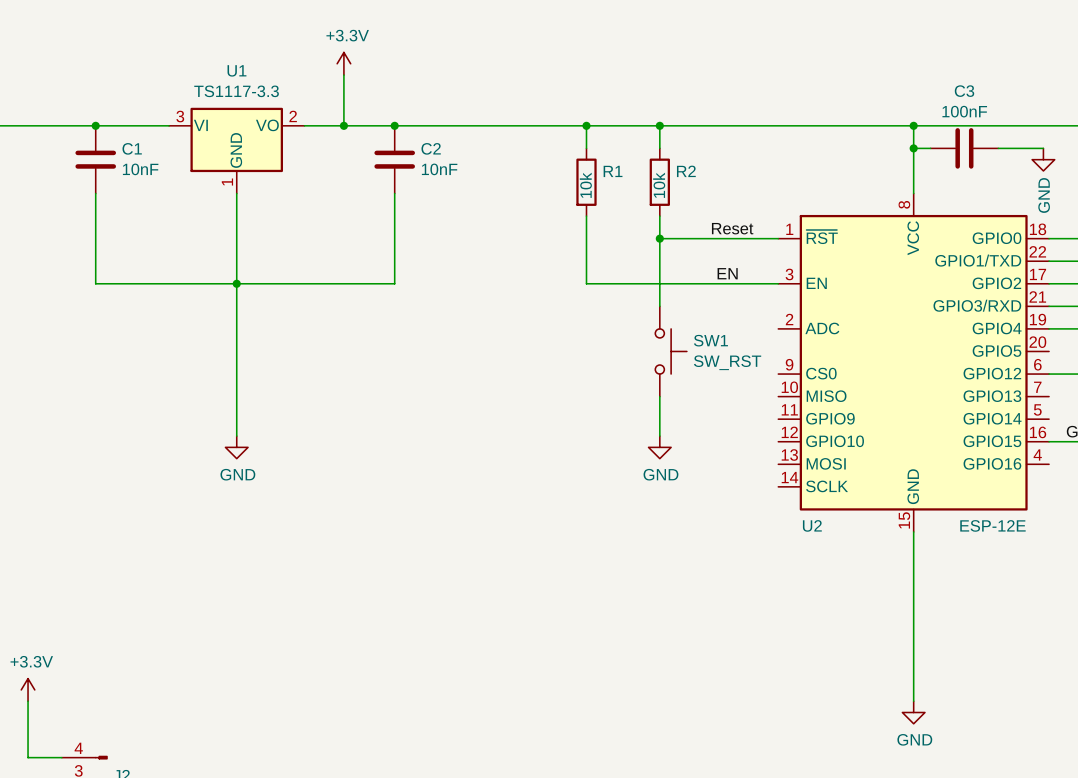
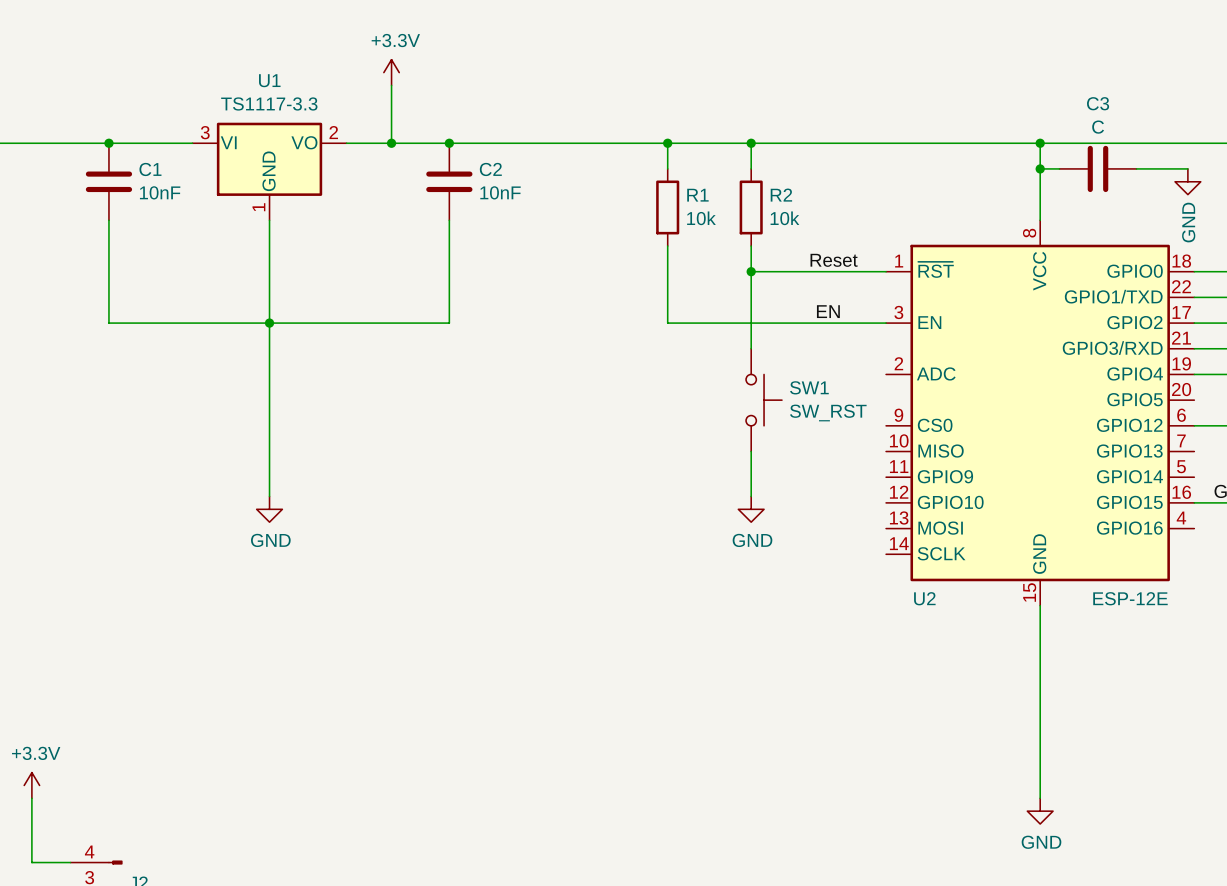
C3 value: 100nF (964, 111) -> C (1098, 127)
R1 value rotation: 0° (585, 185) -> 90° clockwise (701, 218)
R2 value rotation: 0° (659, 185) -> 90° clockwise (784, 218)

